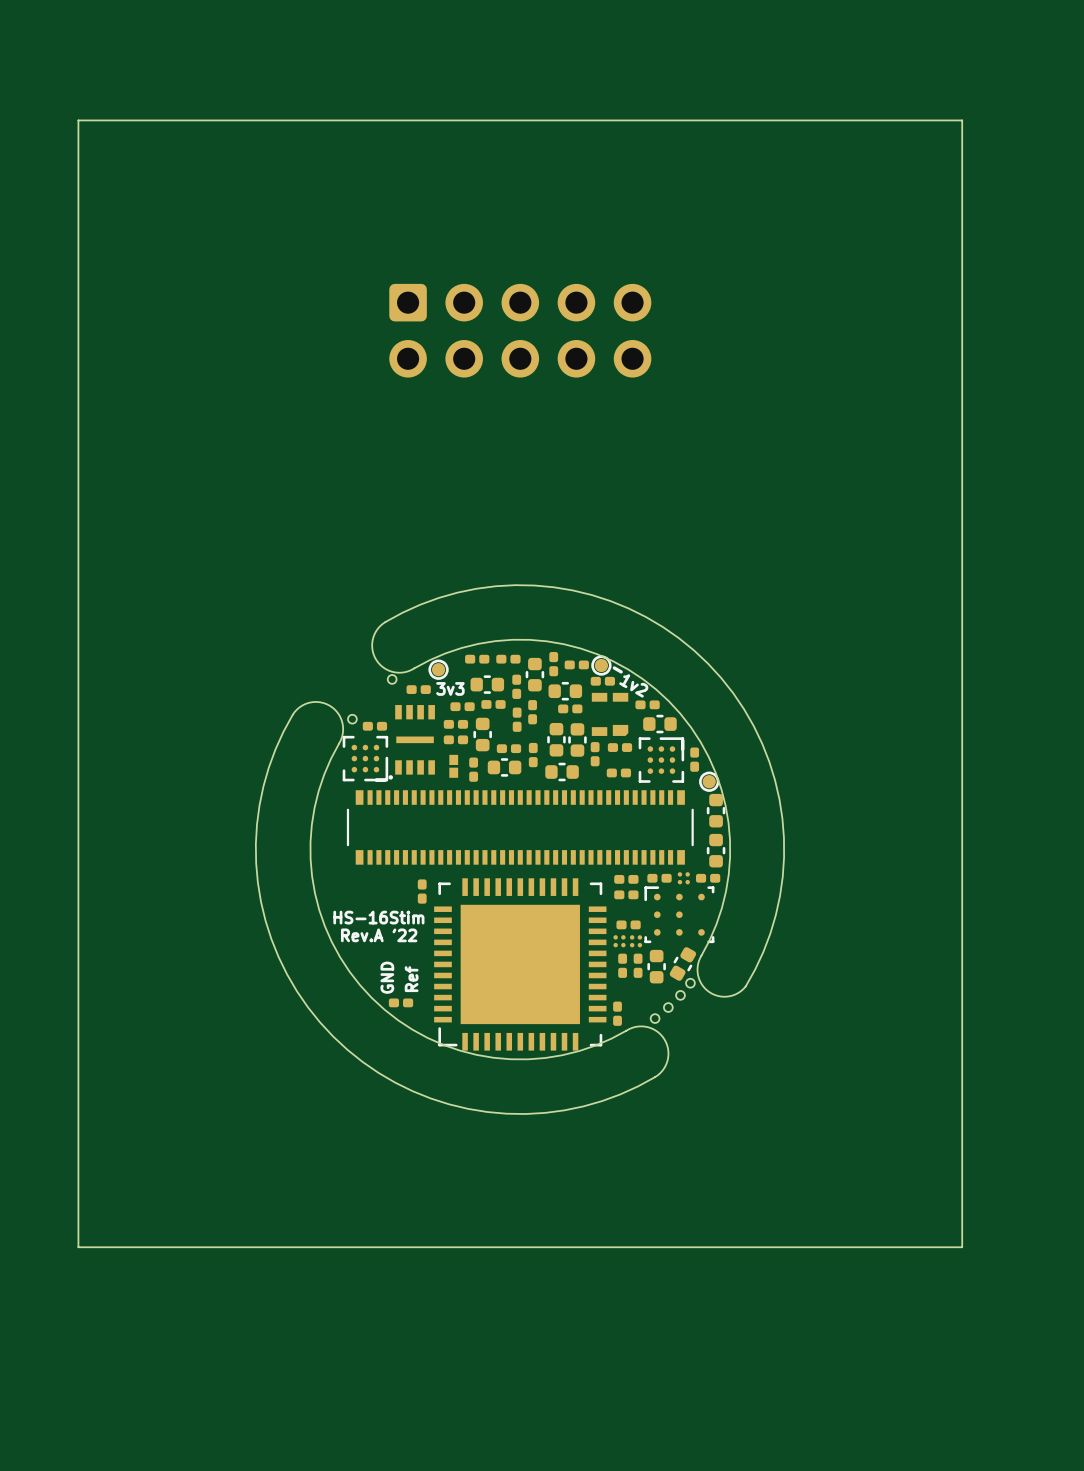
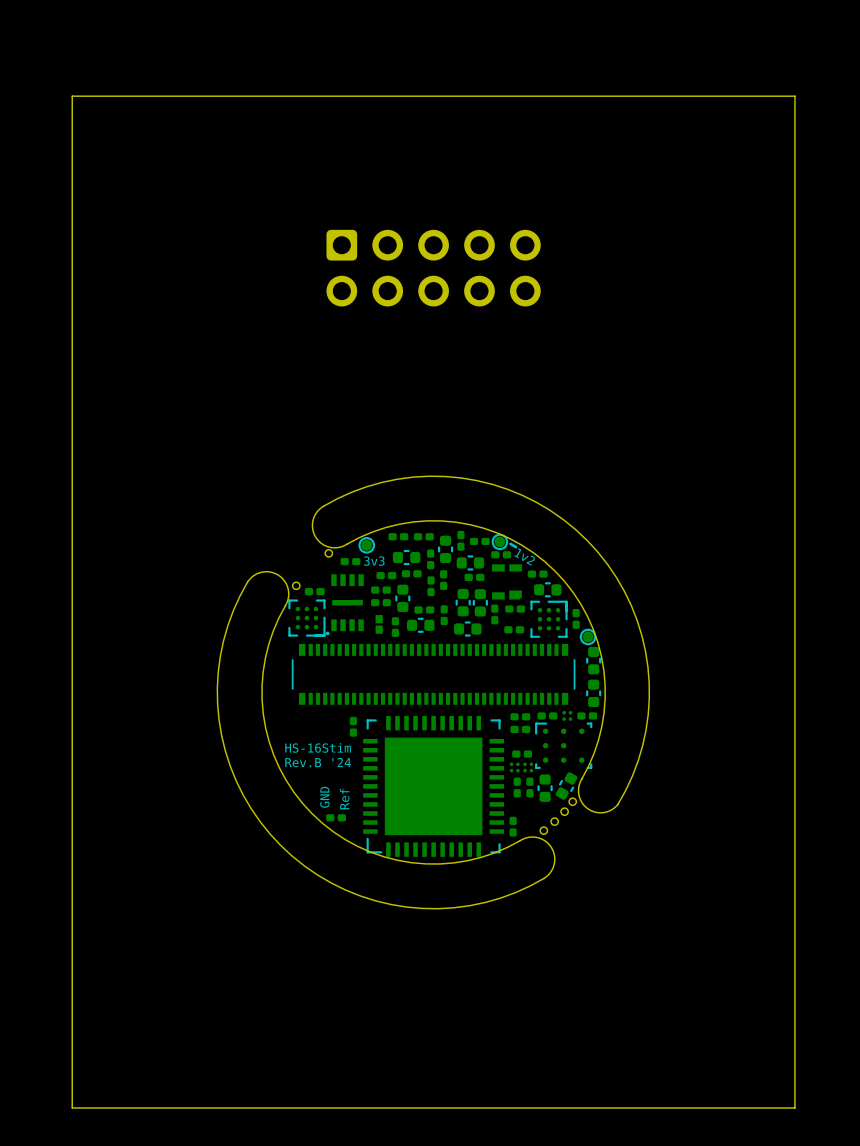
text: Rev.A '22 (379, 935) -> Rev.B '24 (318, 762)
board edge: (962, 1247) (78, 1247) -> (794, 1017) (794, 1107) (72, 1107) (72, 1017)

